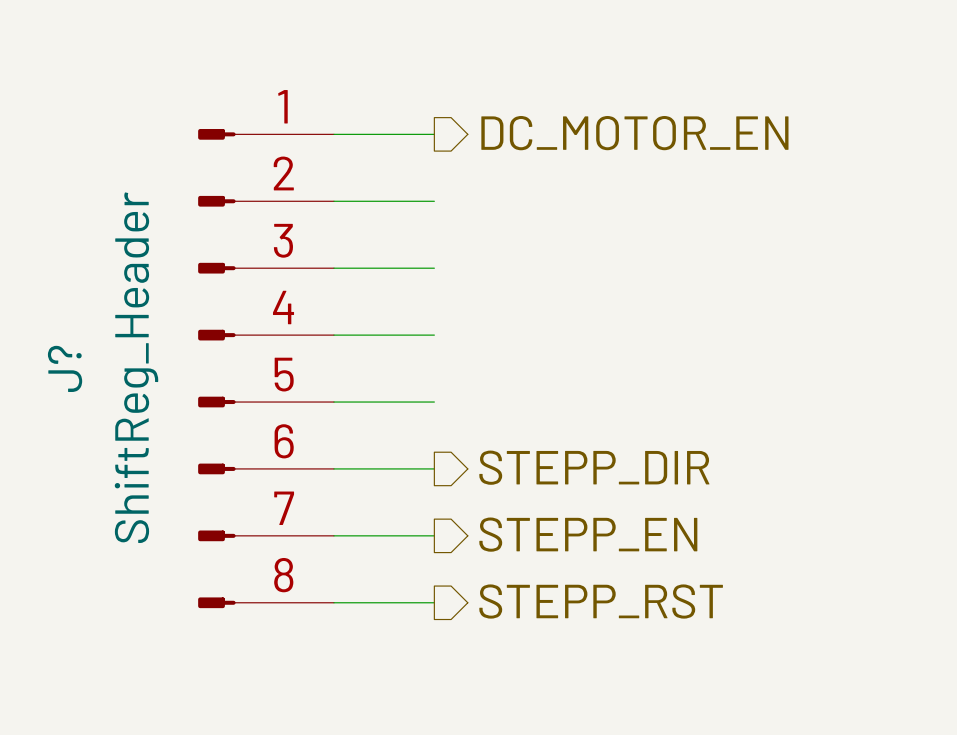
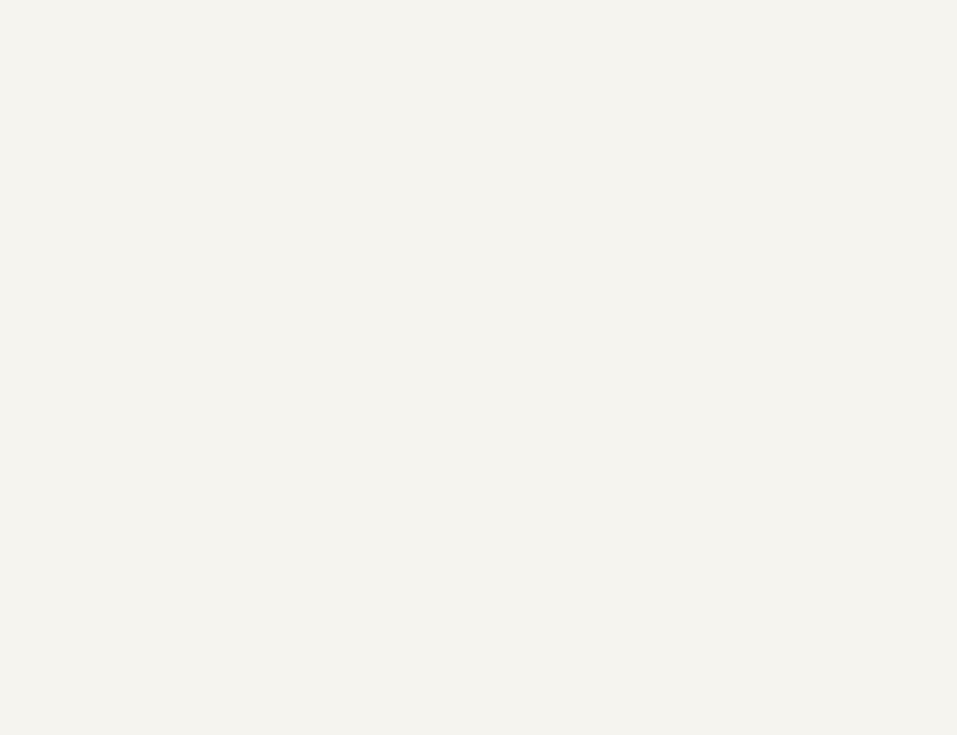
hierarchical label: DC_MOTOR_EN (634, 133) -> none
wire: (333, 134) (434, 134) -> none
wire: (333, 201) (434, 201) -> none
wire: (333, 268) (434, 268) -> none
wire: (333, 335) (434, 335) -> none
J?: ShiftReg_Header (266, 368) -> none
wire: (333, 402) (434, 402) -> none
hierarchical label: STEPP_DIR (594, 467) -> none
wire: (333, 468) (434, 468) -> none
hierarchical label: STEPP_EN (588, 534) -> none
wire: (333, 535) (434, 535) -> none
hierarchical label: STEPP_RST (601, 601) -> none
wire: (333, 602) (434, 602) -> none

